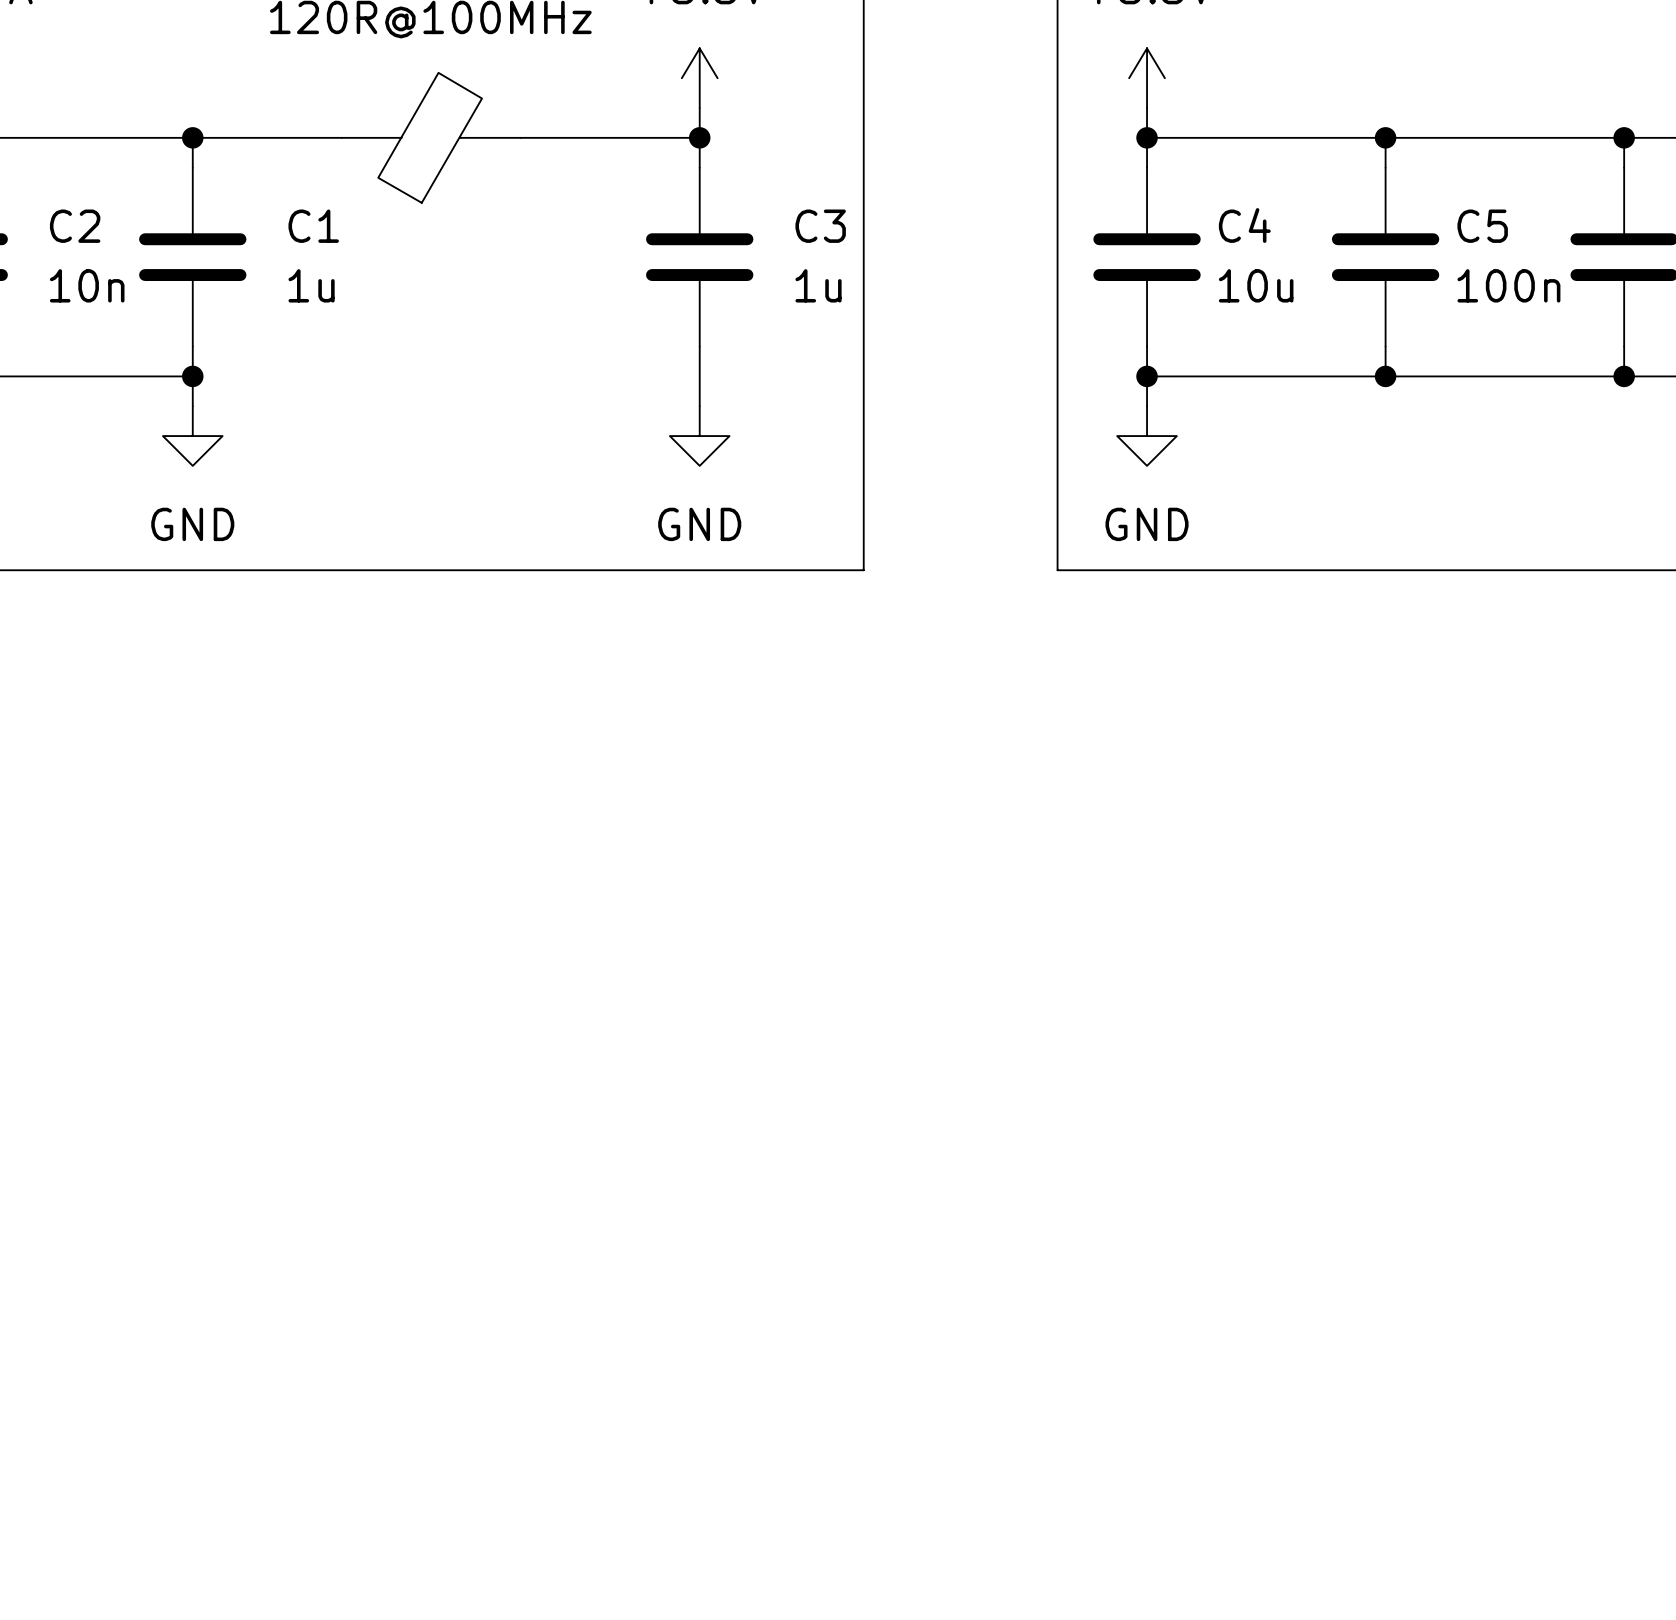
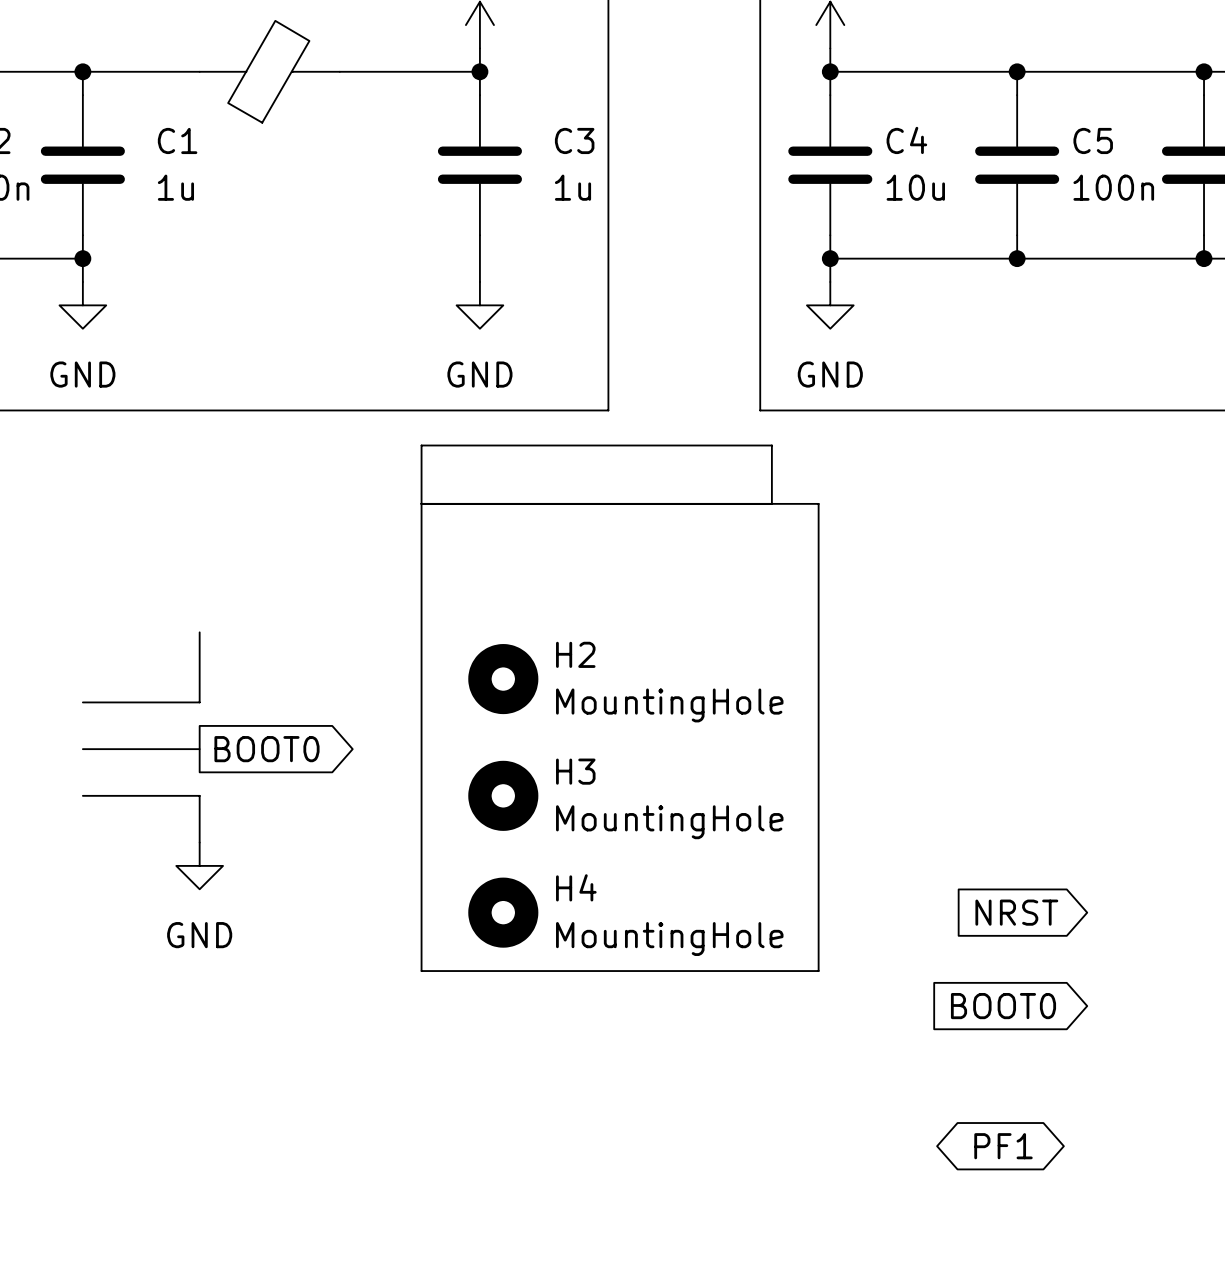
line: none -> (421, 503) (818, 503) (818, 971) (421, 971) (421, 445) (771, 445) (771, 503)
wire: none -> (199, 632) (199, 702) (82, 702)
H2: none -> MountingHole (503, 679)
wire: none -> (82, 749) (199, 749)
global label: none -> BOOT0 (266, 749)
wire: none -> (82, 795) (199, 795) (199, 842)
H3: none -> MountingHole (503, 795)
power symbol: none -> GND (199, 865)
H4: none -> MountingHole (503, 912)
global label: none -> NRST (1016, 912)
global label: none -> BOOT0 (1003, 1006)
global label: none -> PF1 (1003, 1146)

